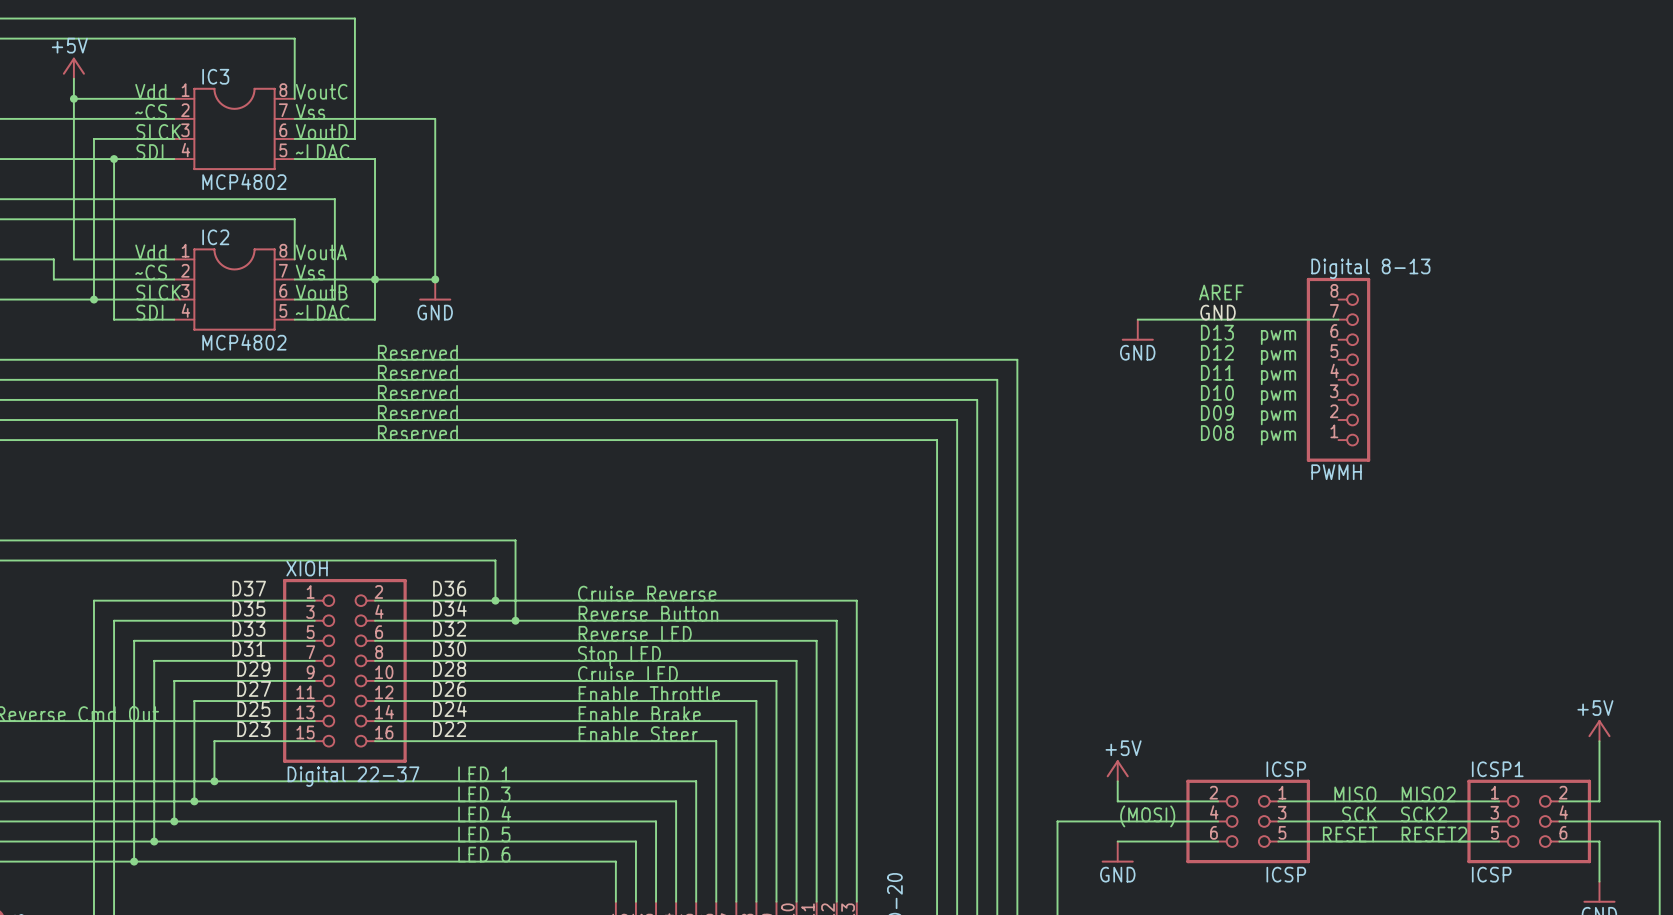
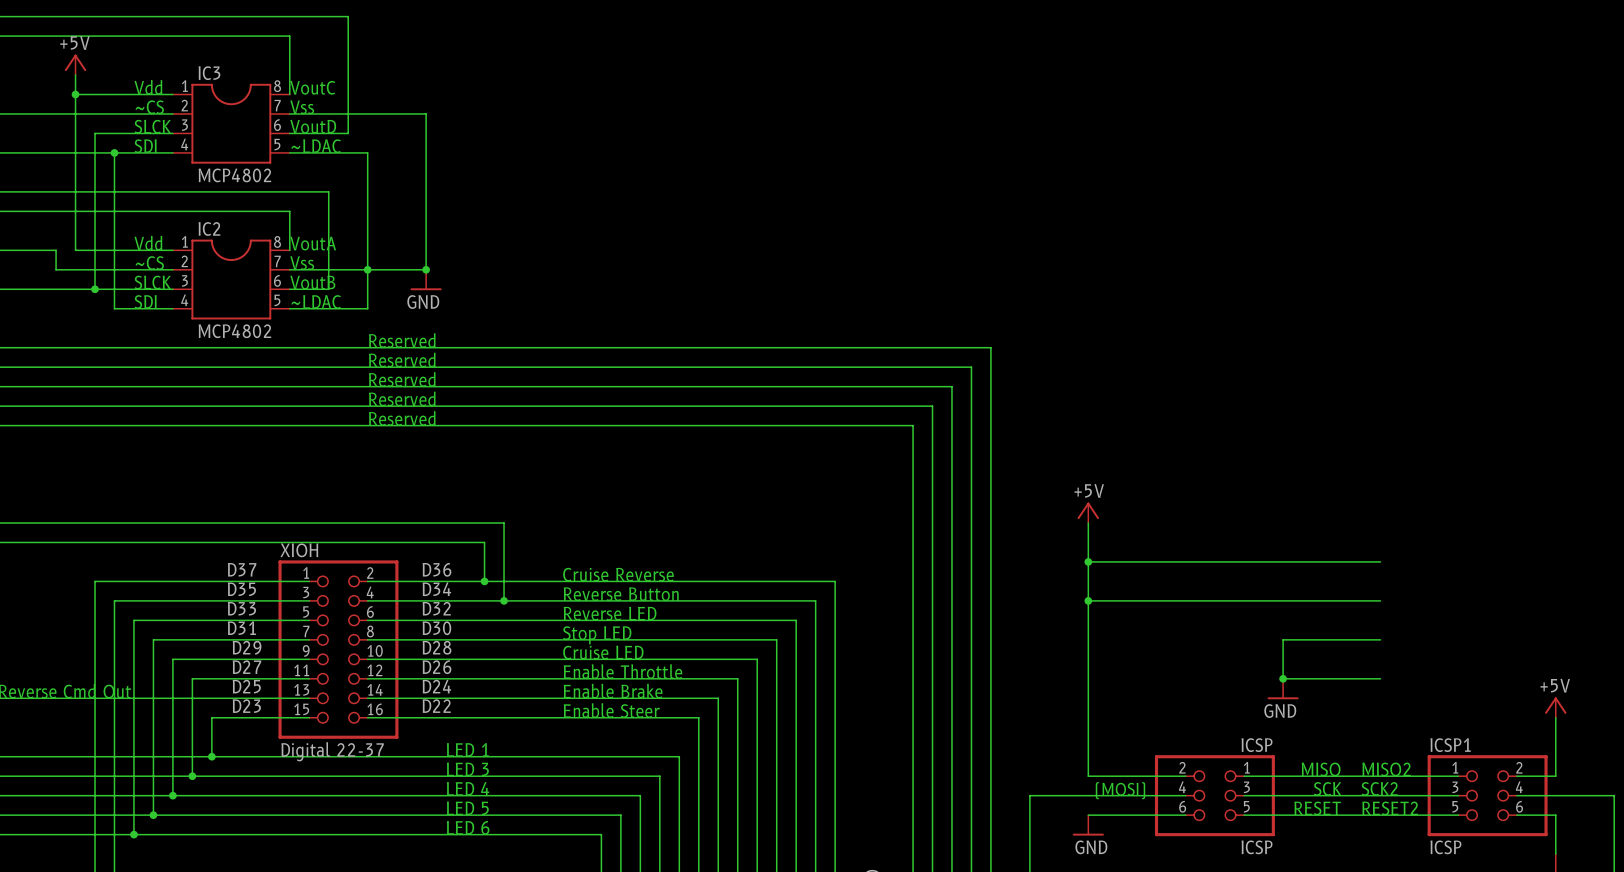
text: AREF (1221, 292) -> none
label: GND (1218, 312) -> none
wire: (1137, 319) (1338, 319) -> none
power symbol: GND (1137, 330) -> none
text: D13 (1217, 332) -> none
text: pwm (1278, 337) -> none
text: D12 (1217, 352) -> none
text: pwm (1278, 357) -> none
PWMH: Digital 8-13 (1338, 369) -> none
text: D11 (1217, 372) -> none
text: pwm (1278, 377) -> none
text: D10 (1217, 392) -> none
text: pwm (1278, 397) -> none
text: D09 (1217, 412) -> none
text: pwm (1278, 417) -> none
text: D08 (1217, 433) -> none
text: pwm (1278, 437) -> none
power symbol: none -> +5V (1088, 512)
wire: none -> (1088, 523) (1088, 756)
wire: none -> (1088, 561) (1380, 561)
junction: none -> (1088, 561)
wire: none -> (1088, 600) (1380, 600)
junction: none -> (1088, 600)
wire: none -> (1380, 639) (1283, 639) (1283, 678) (1380, 678)
junction: none -> (1283, 678)
power symbol: none -> GND (1283, 689)
power symbol: +5V (1117, 770) -> none

